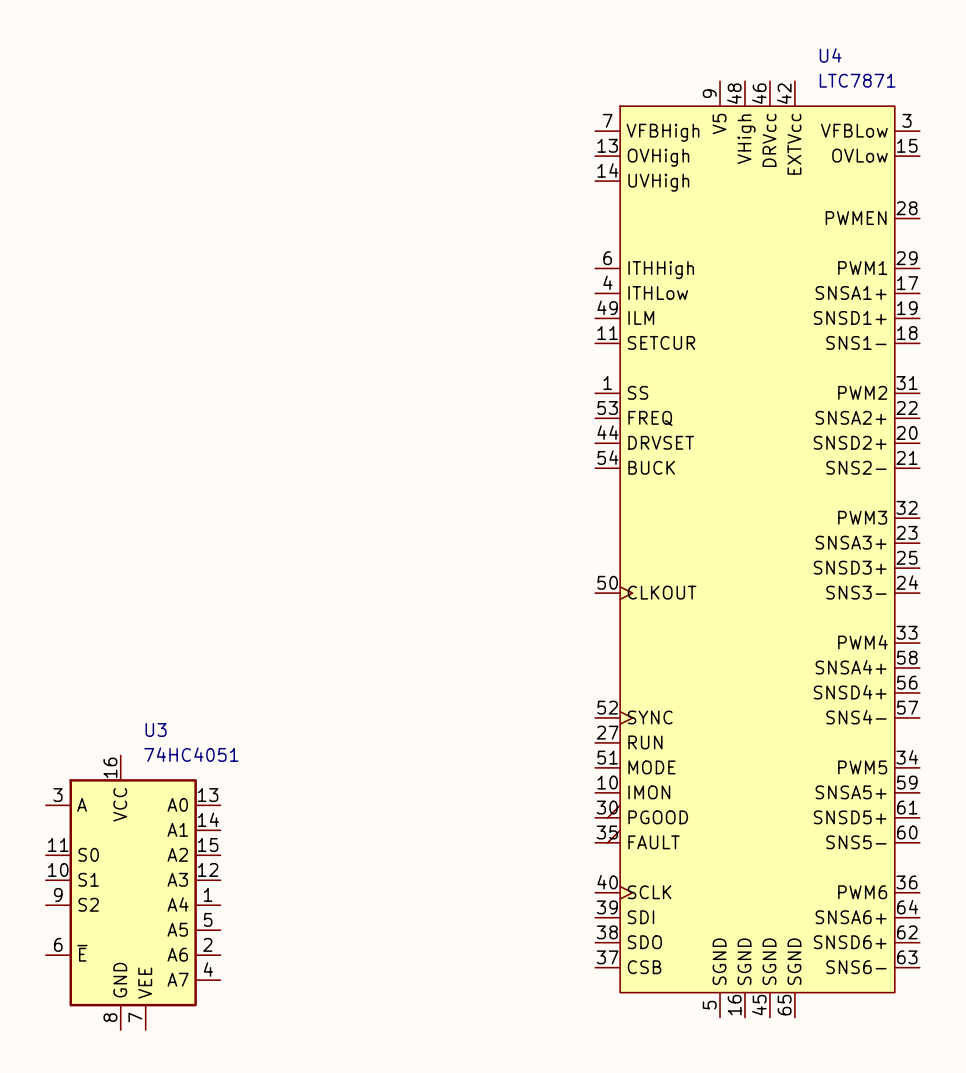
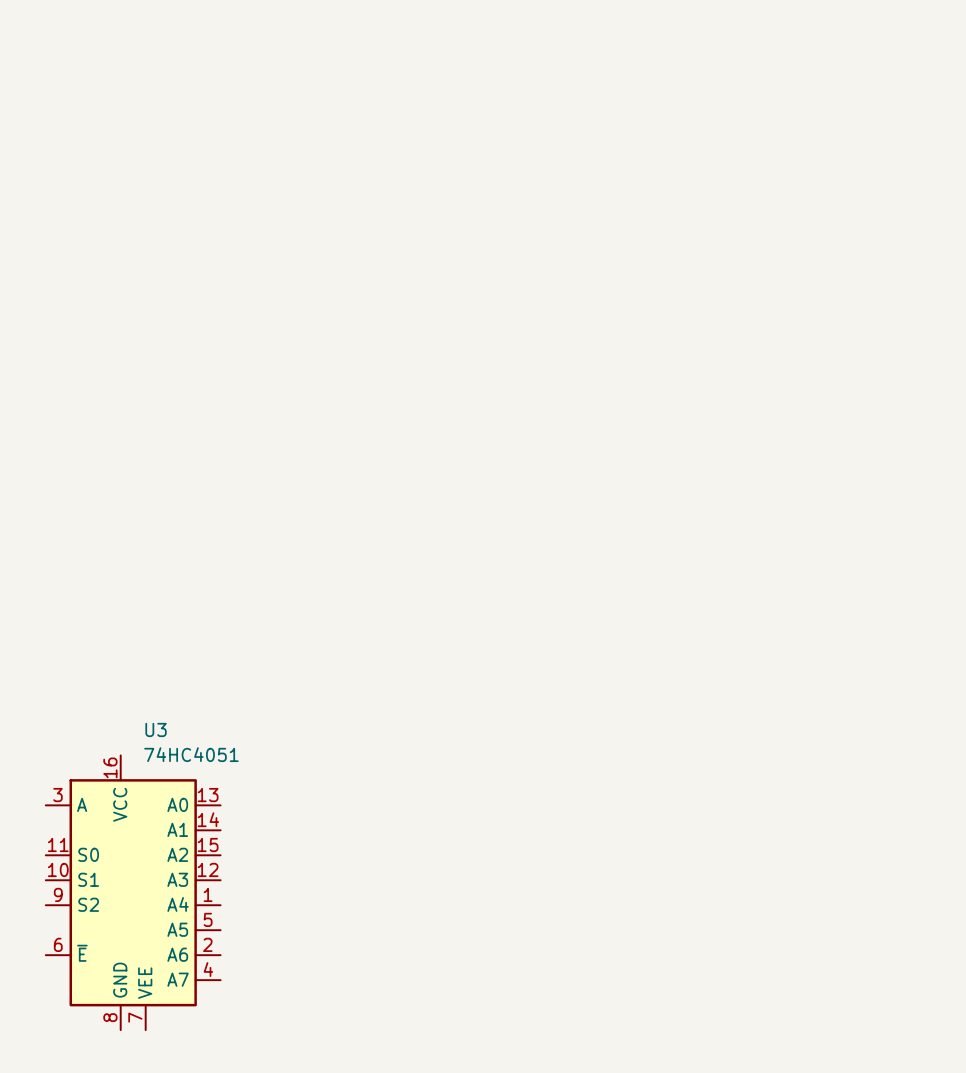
U4: LTC7871 (757, 549) -> none

